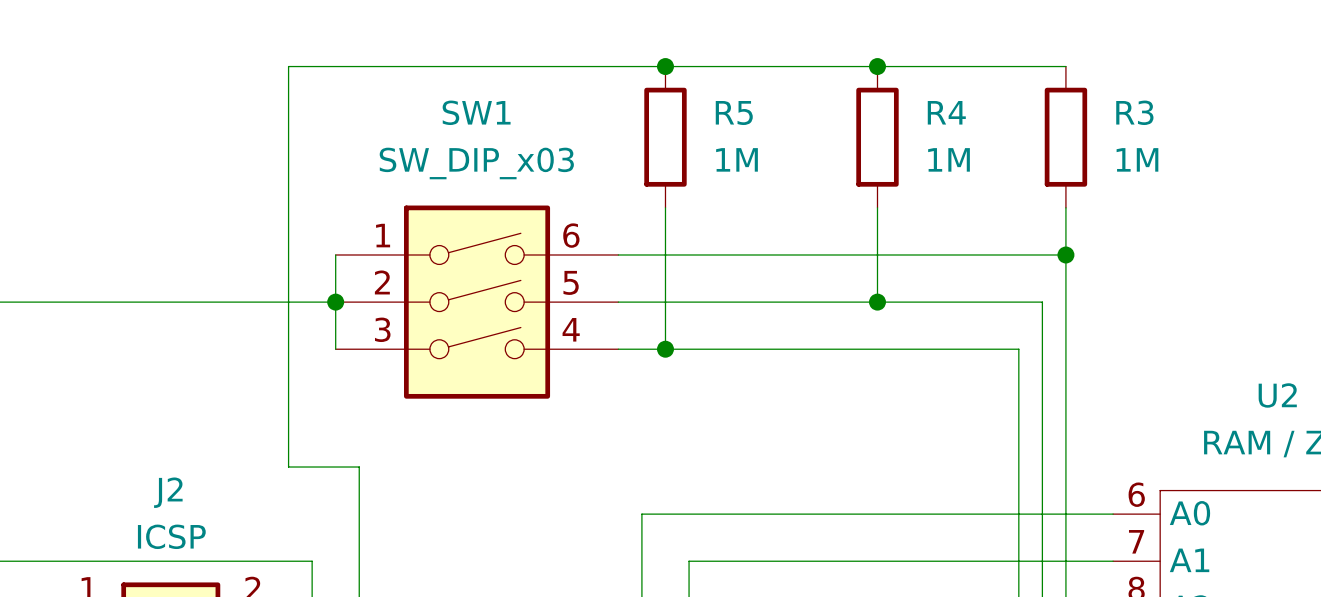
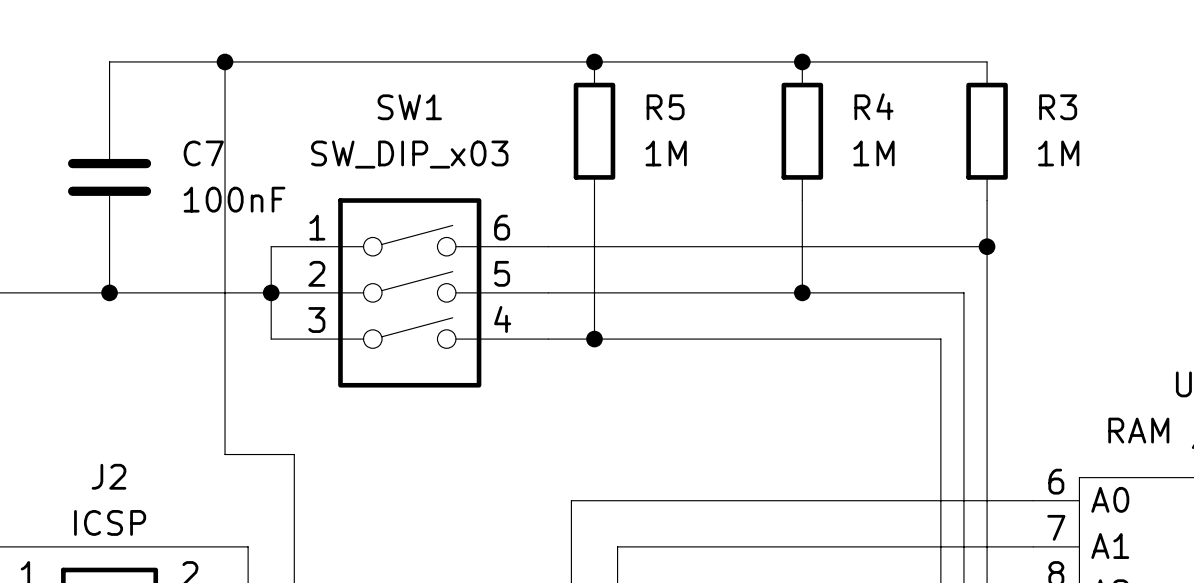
wire: none -> (225, 61) (109, 61) (109, 108)
junction: none -> (225, 61)
C7: none -> 100nF (109, 177)
wire: none -> (109, 246) (109, 292)
junction: none -> (109, 292)

